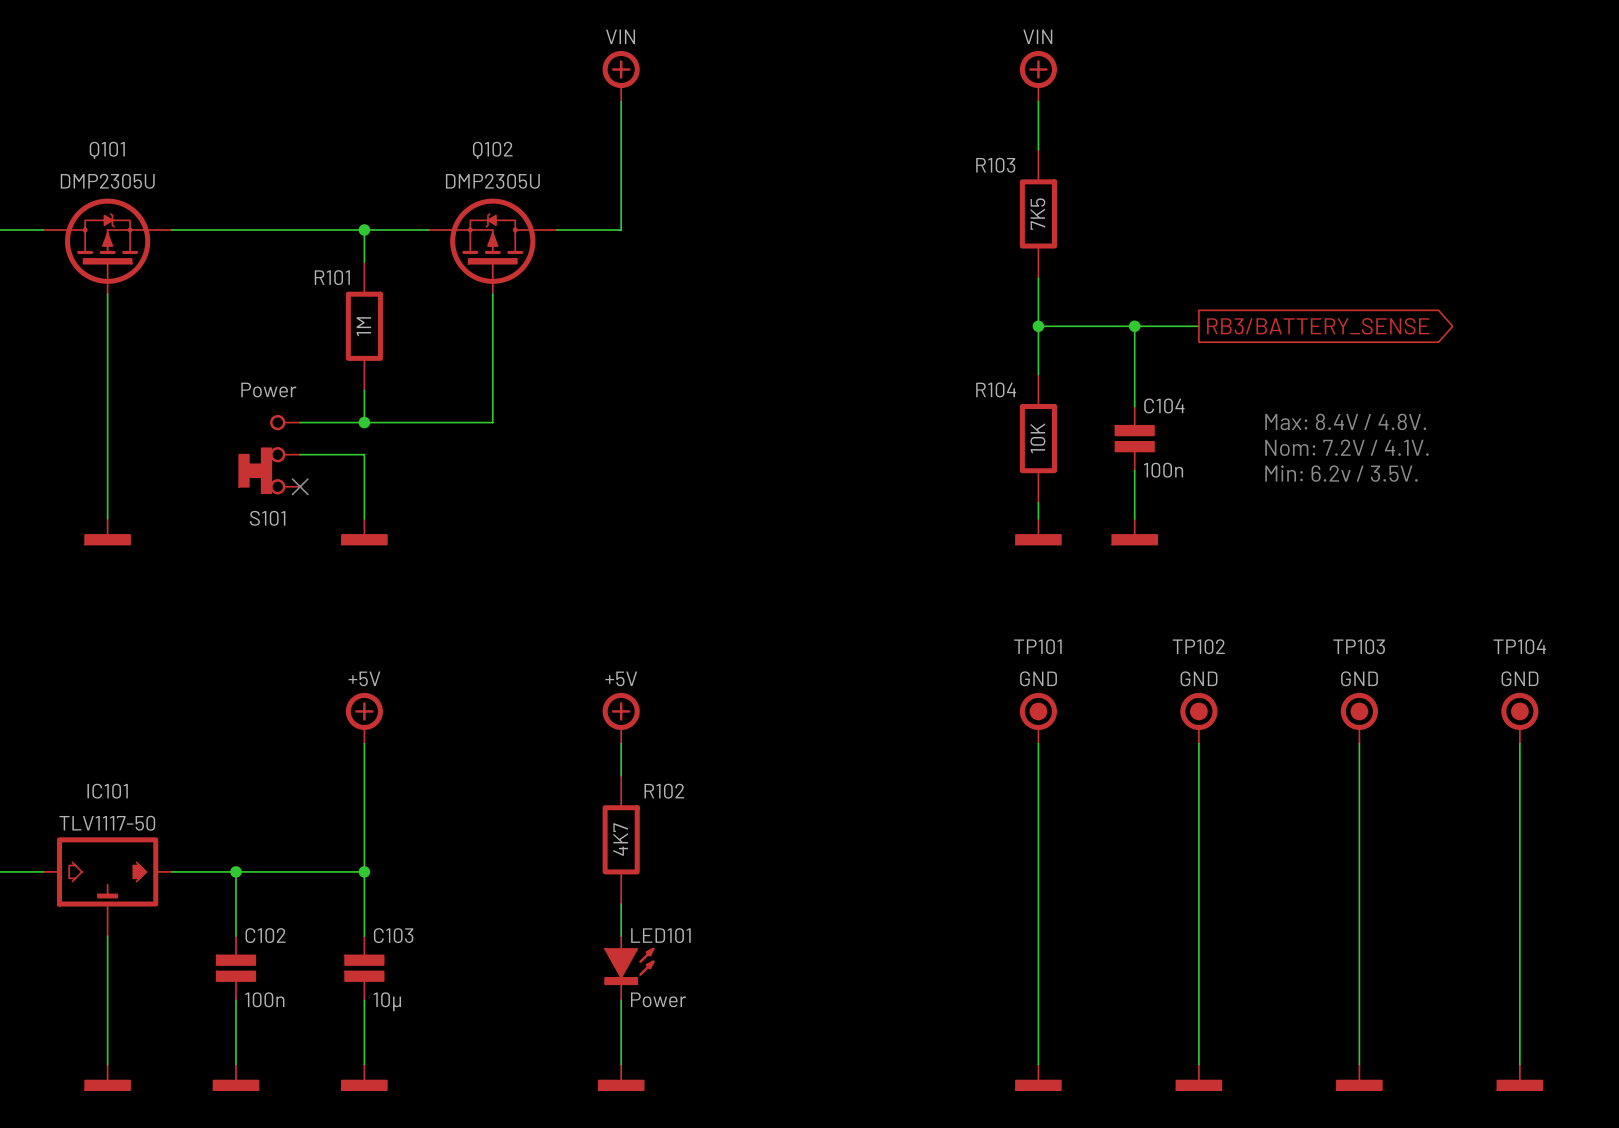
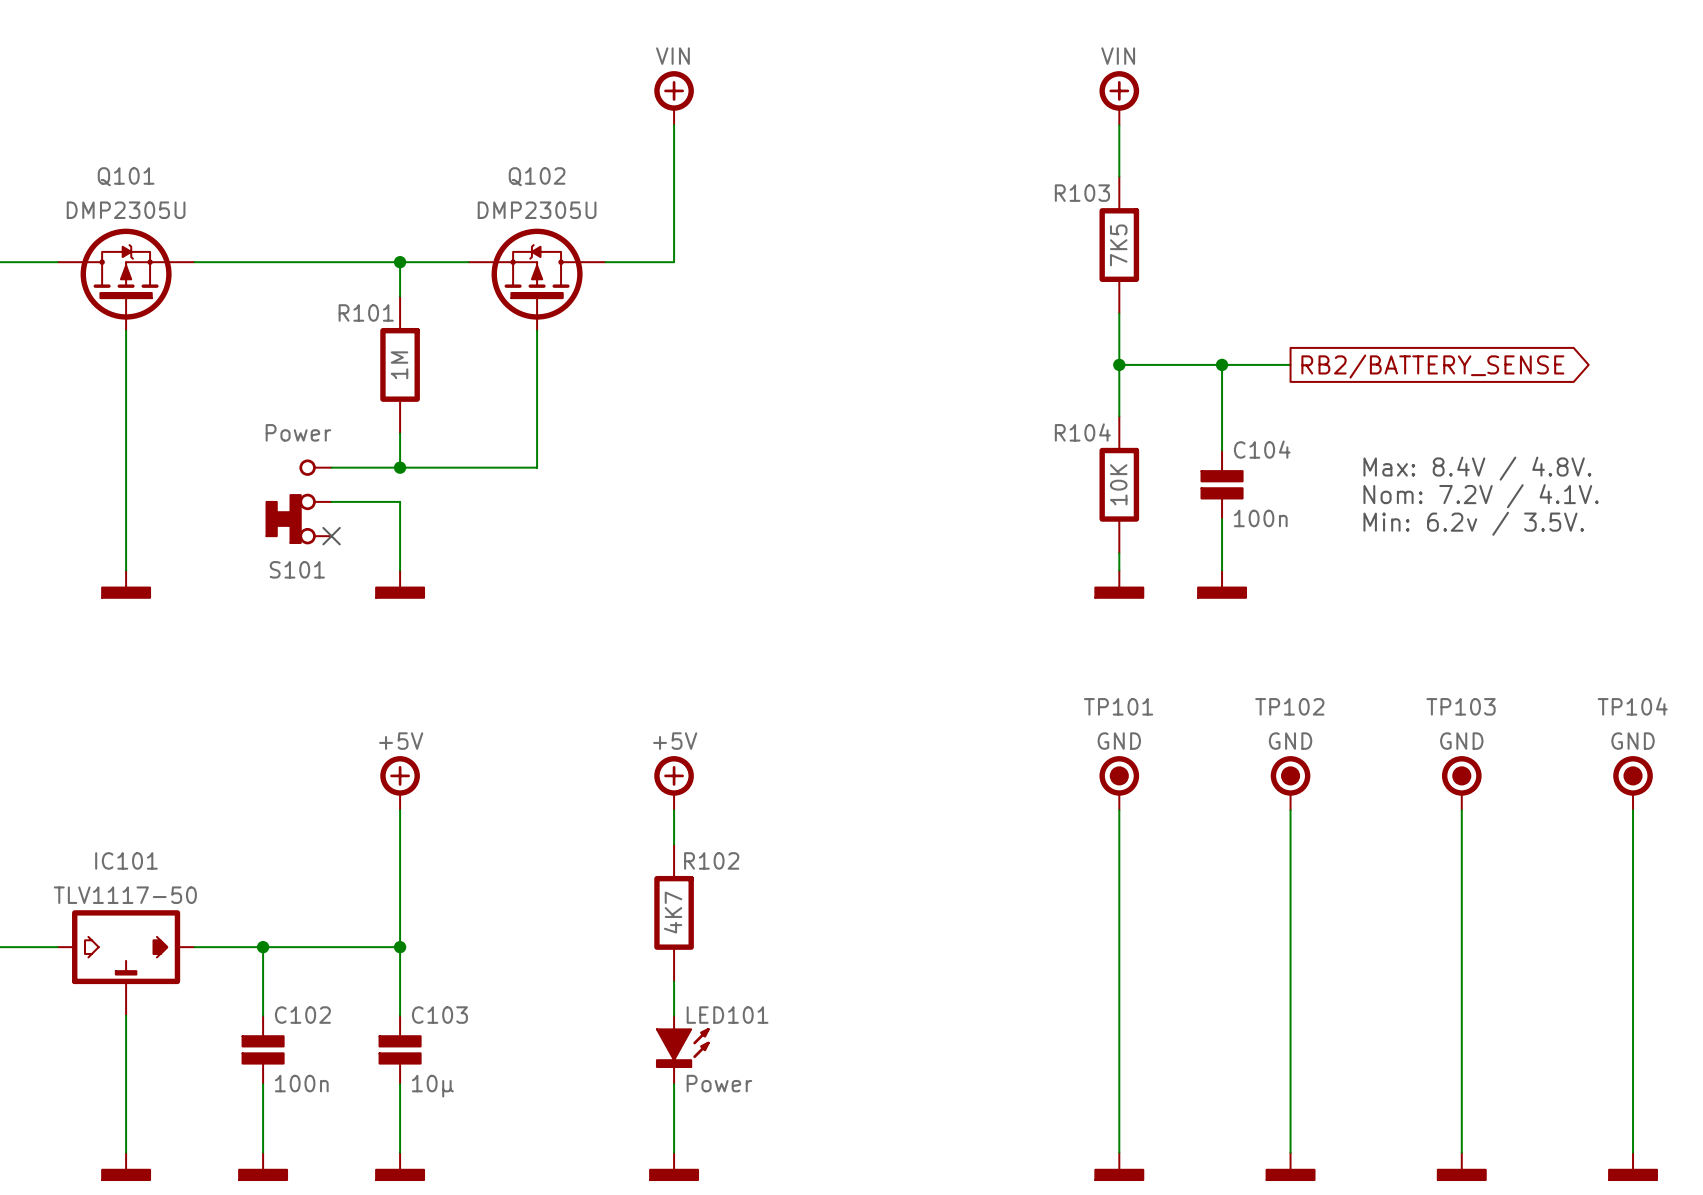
global label: RB3/BATTERY_SENSE (1318, 326) -> RB2/BATTERY_SENSE (1432, 366)

